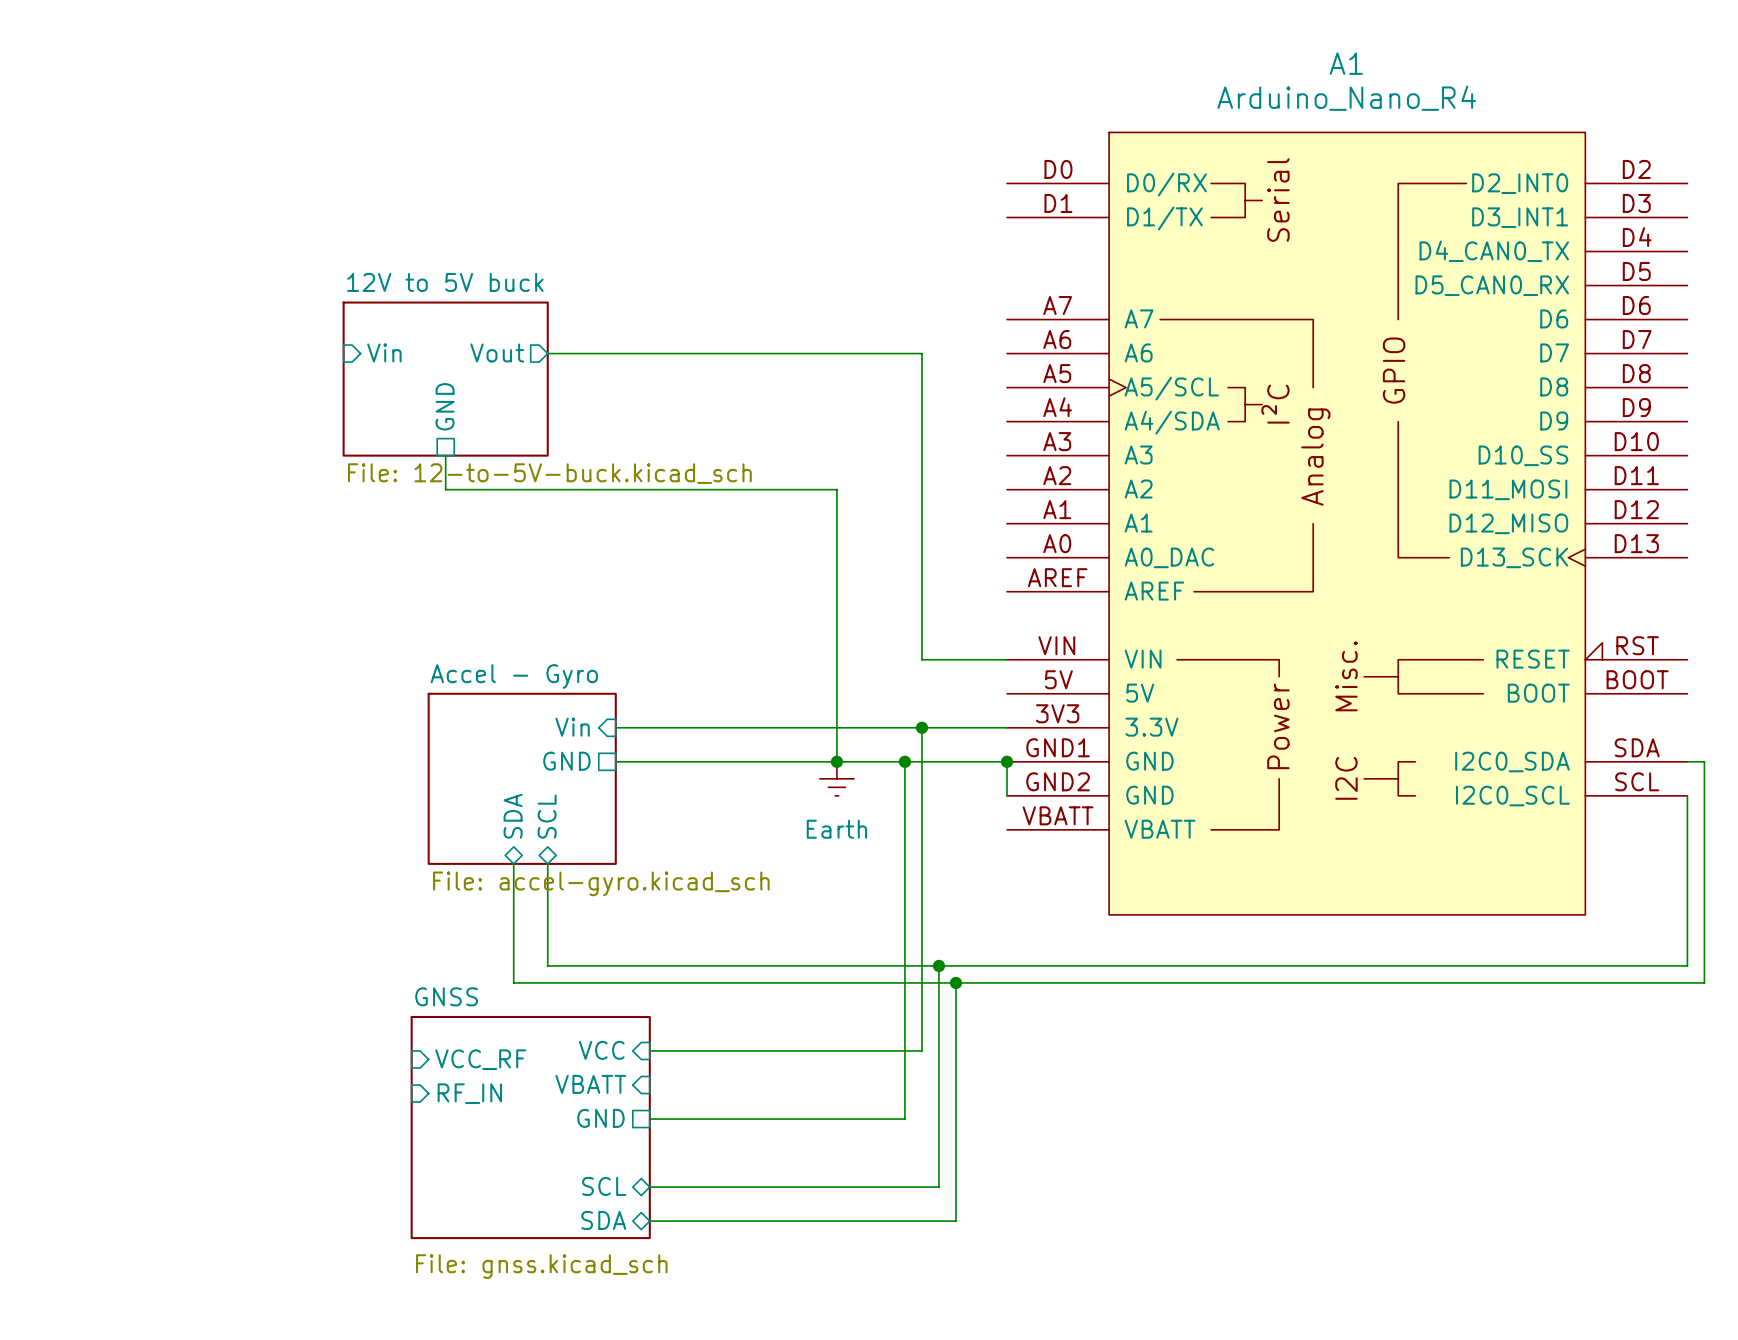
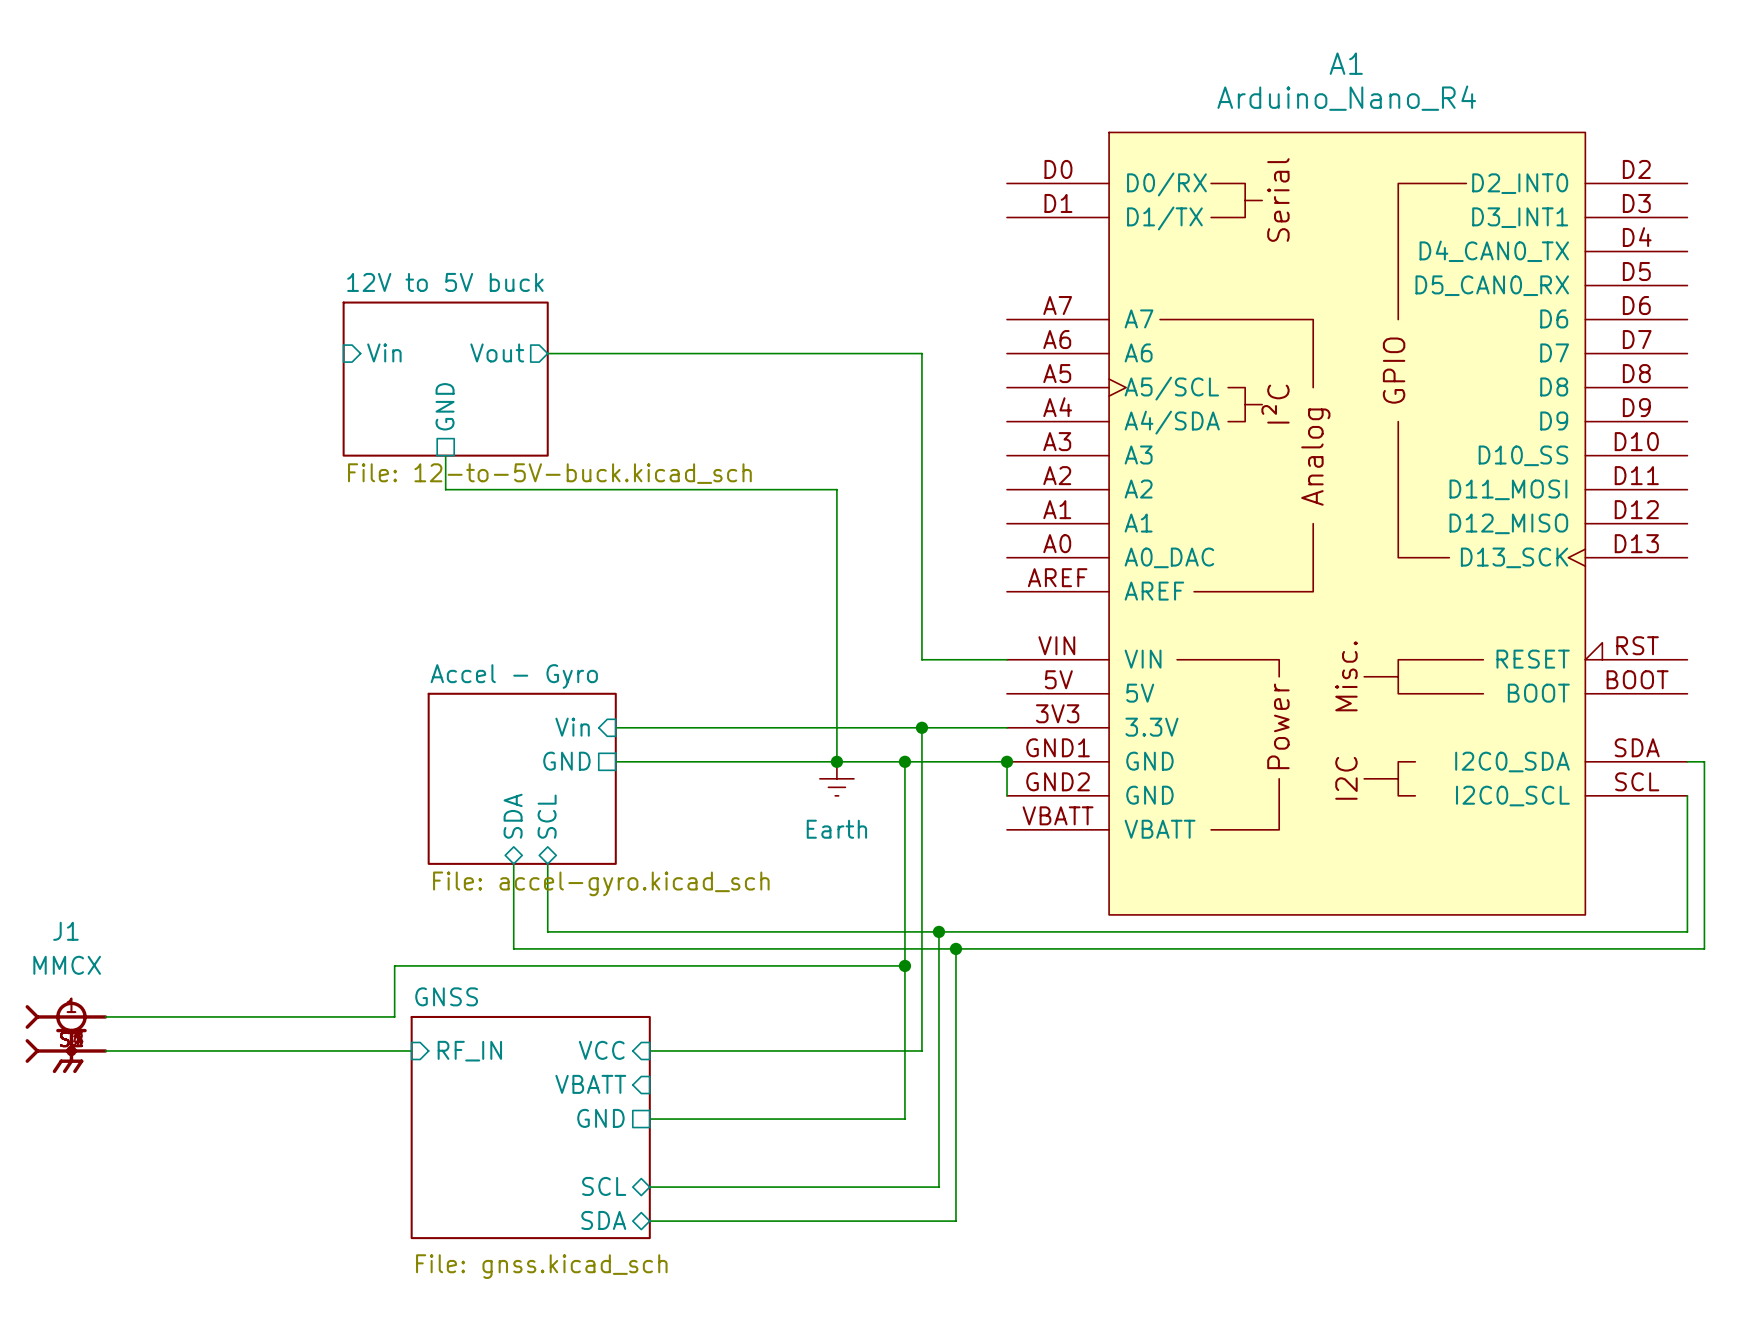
wire: (547, 931) (547, 965) -> (105, 1016) (394, 1016) (394, 965) (547, 965)
wire: none -> (938, 931) (938, 965)
junction: none -> (938, 931)
wire: (1687, 931) (1687, 965) (904, 965) -> (1687, 931) (547, 931)
wire: (513, 948) (513, 982) (1704, 982) (1704, 948) -> (513, 948) (1704, 948)
wire: none -> (955, 948) (955, 982)
junction: none -> (955, 948)
junction: none -> (904, 965)
junction: (938, 965) -> none
junction: (955, 982) -> none
J1: none -> MMCX (66, 1037)
wire: none -> (105, 1050) (411, 1050)
sheet pin: VCC_RF (480, 1059) -> none
sheet pin position: RF_IN (469, 1093) -> RF_IN (469, 1051)

